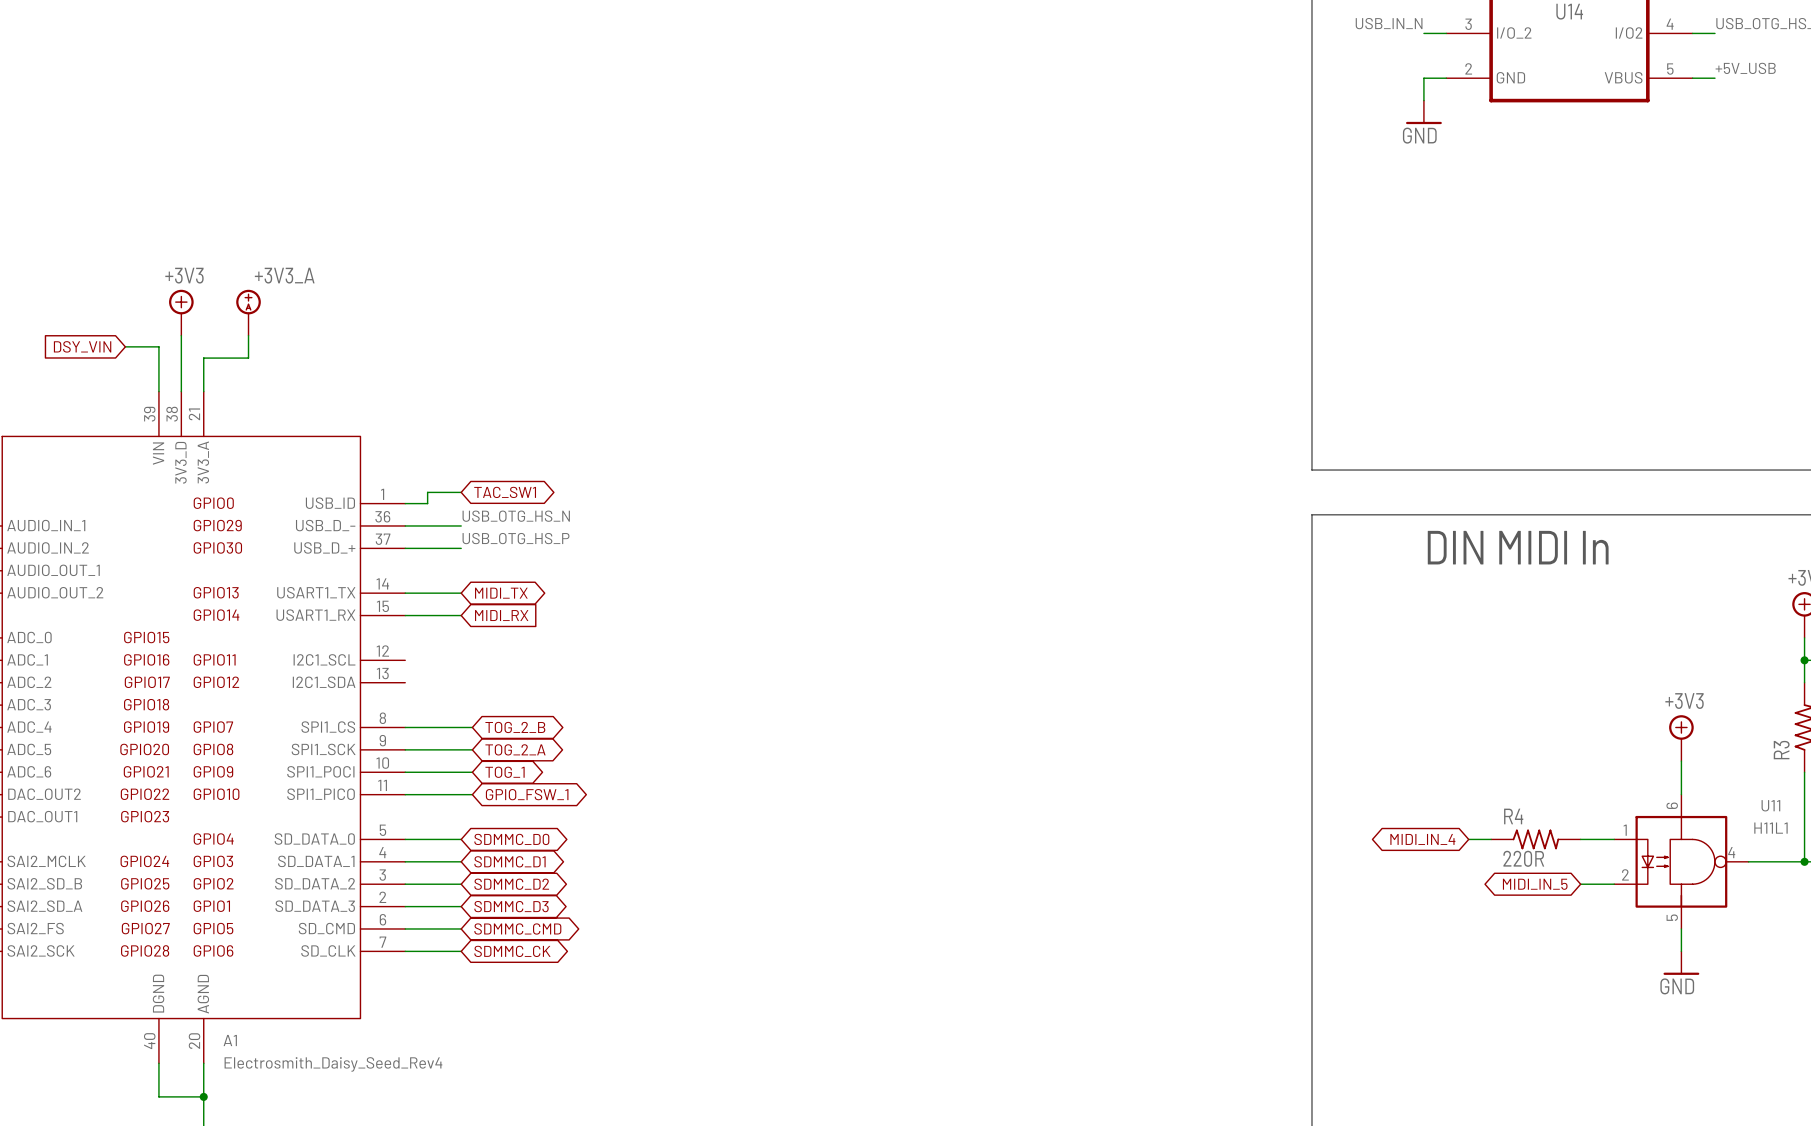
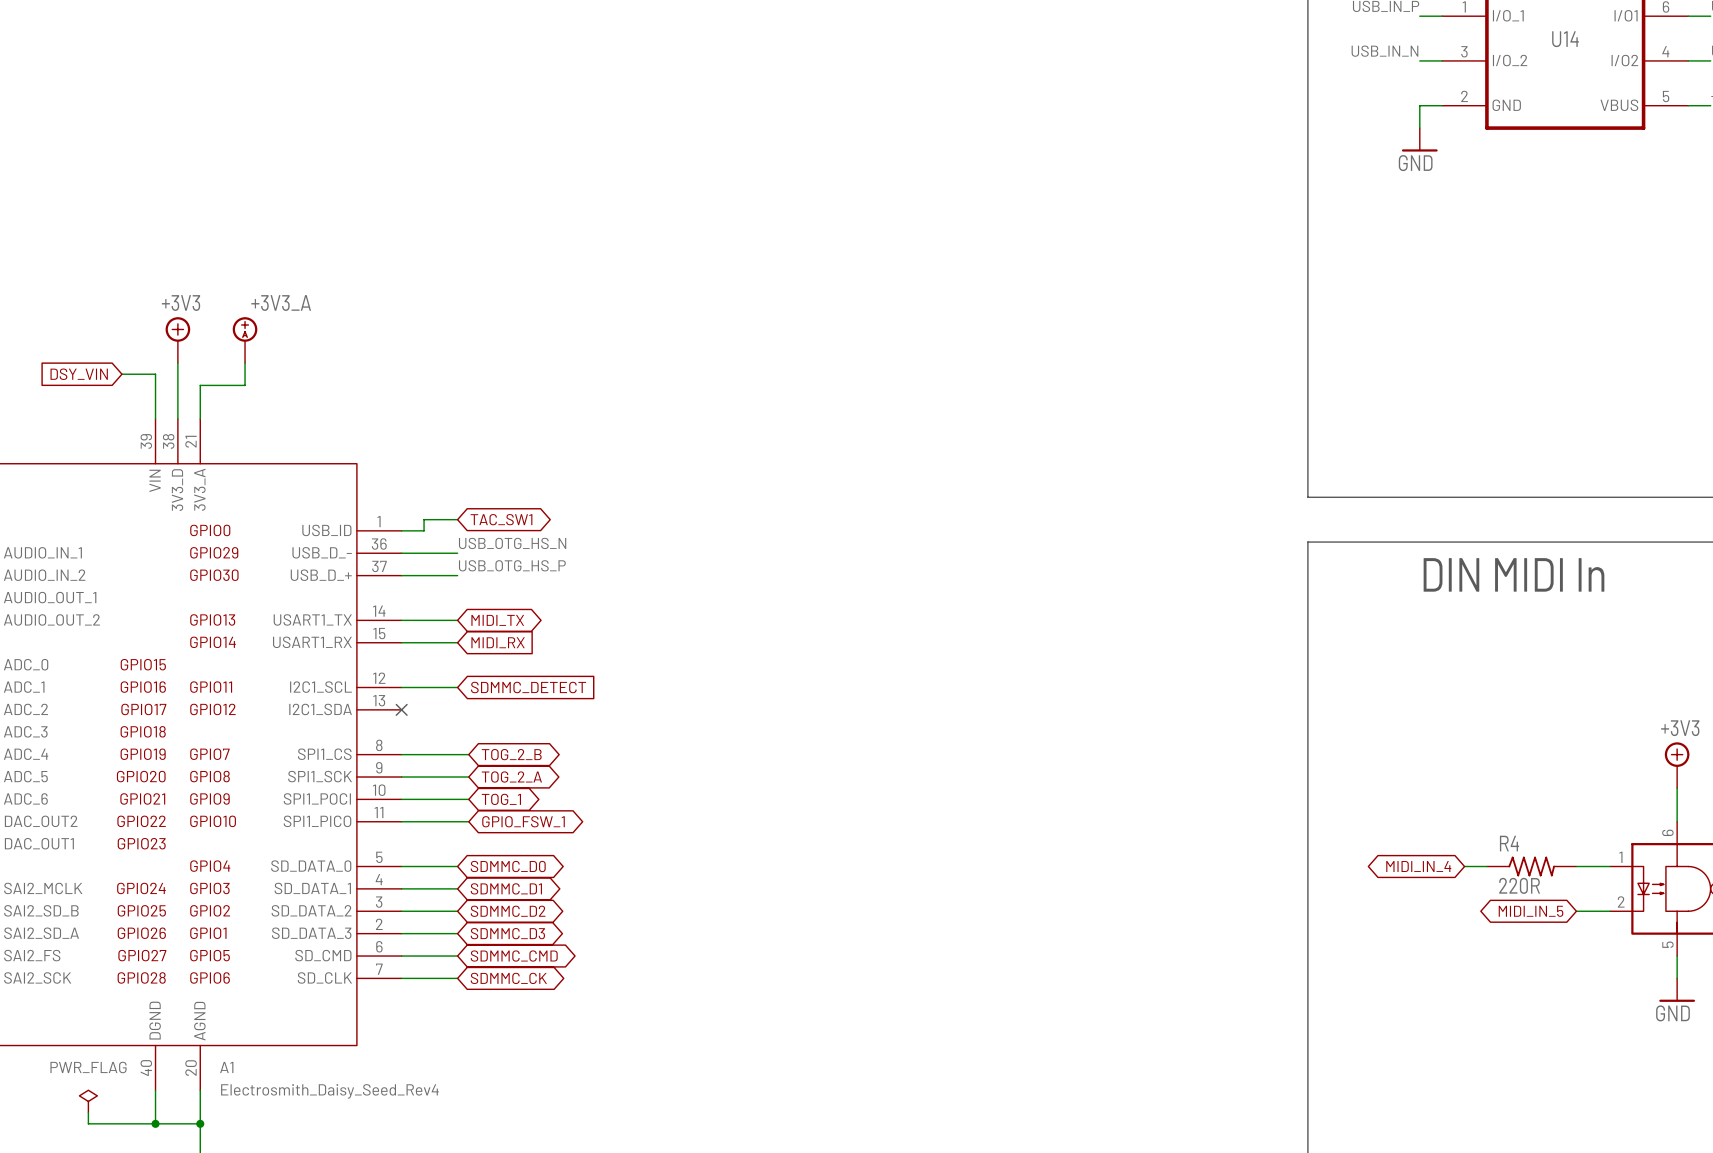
wire: none -> (401, 687) (457, 687)
global label: none -> SDMMC_DETECT (528, 687)
no-connect mark: none -> (401, 709)
power symbol: none -> PWR_FLAG (88, 1101)
wire: none -> (88, 1112) (88, 1123) (155, 1123)
junction: none -> (155, 1123)

